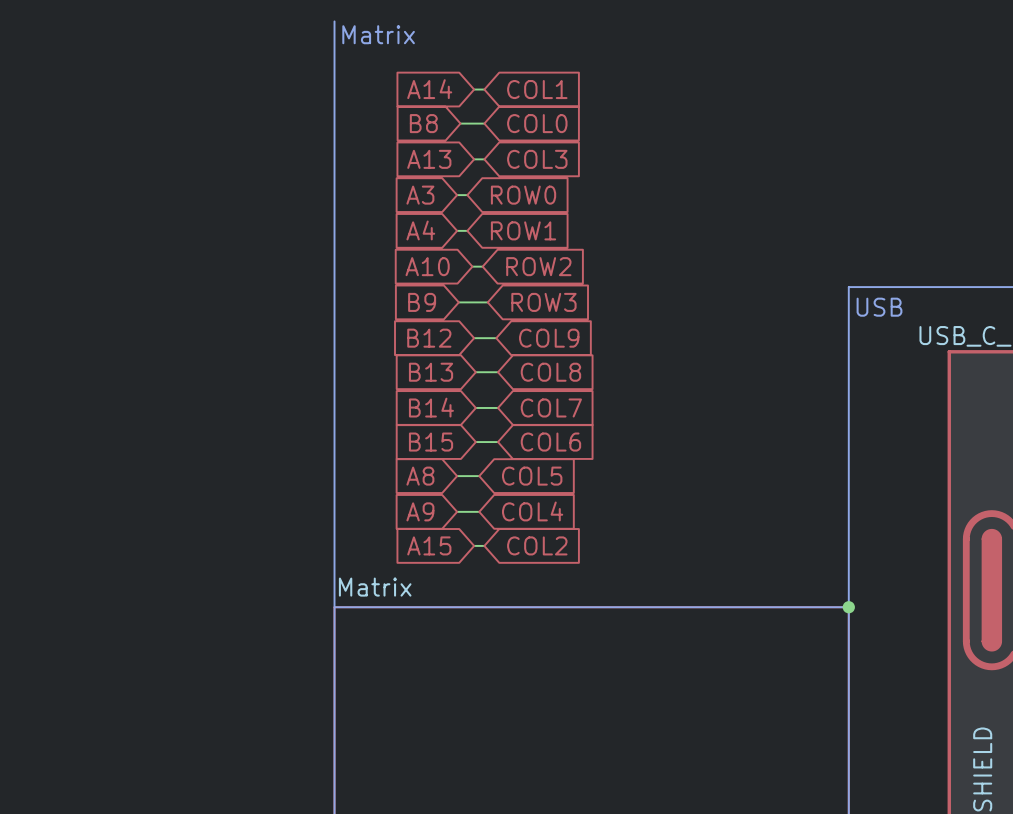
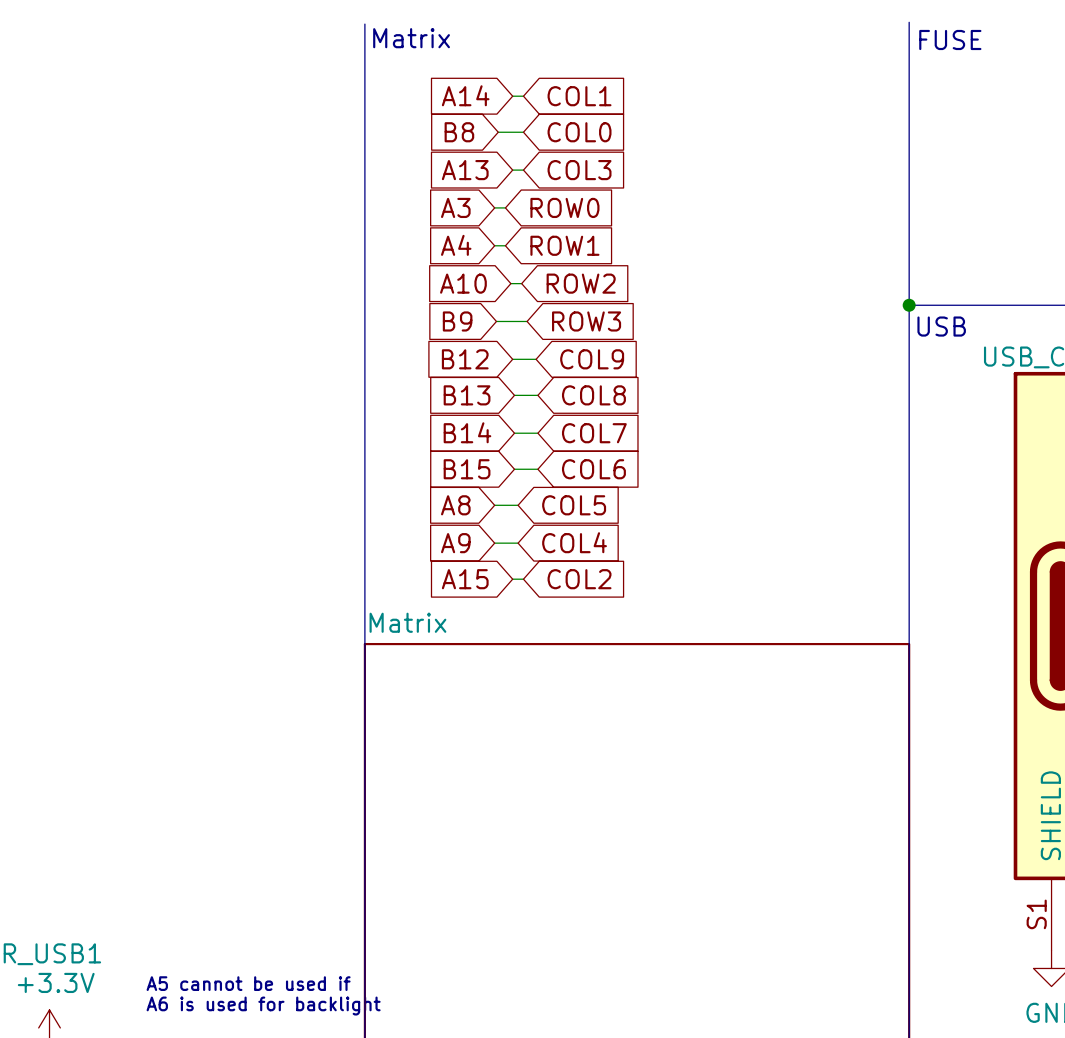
bus: none -> (909, 22) (909, 305)
text: none -> FUSE (950, 39)
junction: none -> (909, 305)
bus: (336, 607) (848, 607) -> none
junction: (848, 607) -> none

